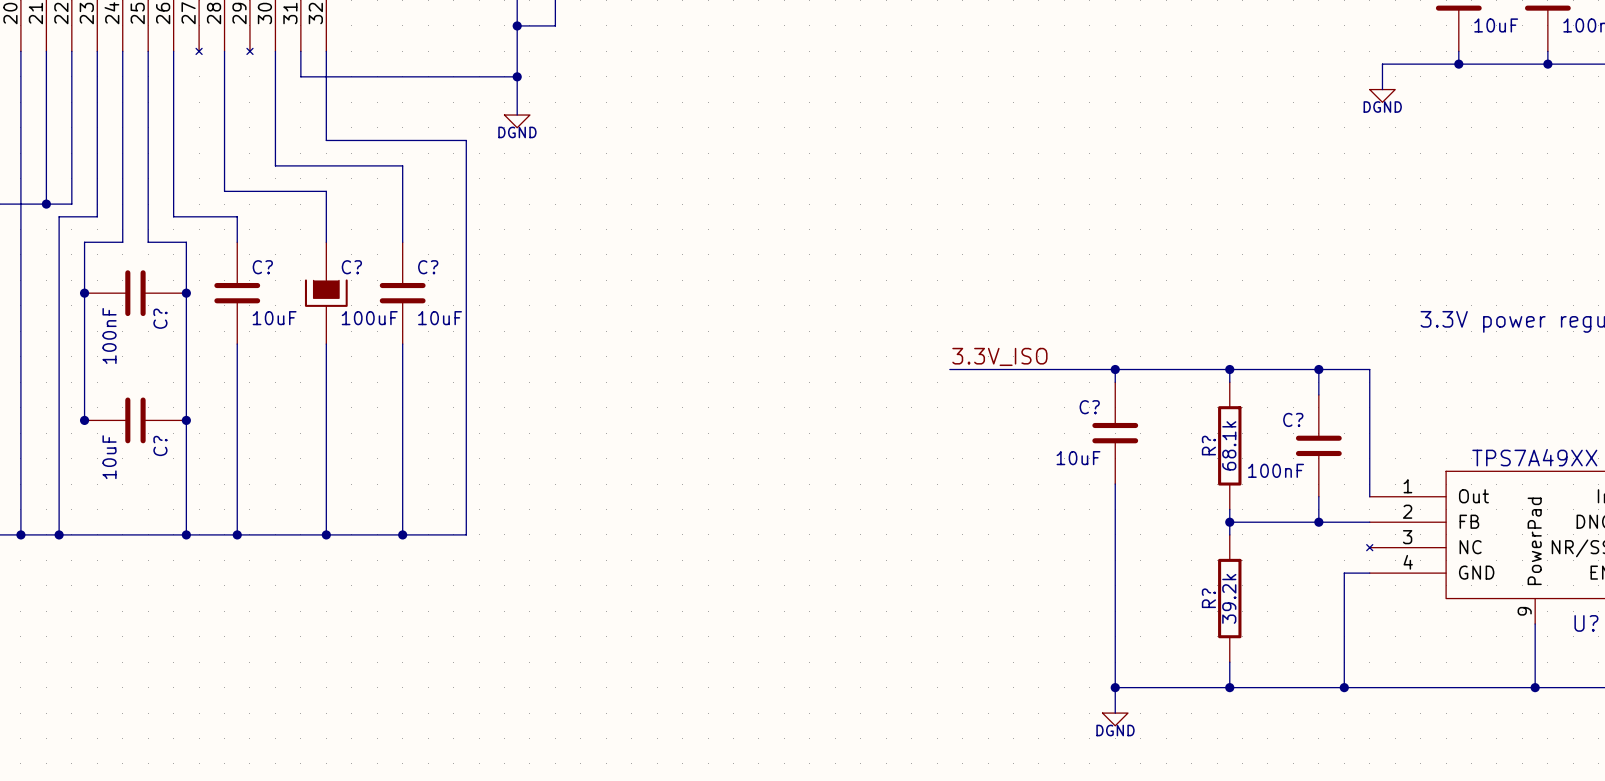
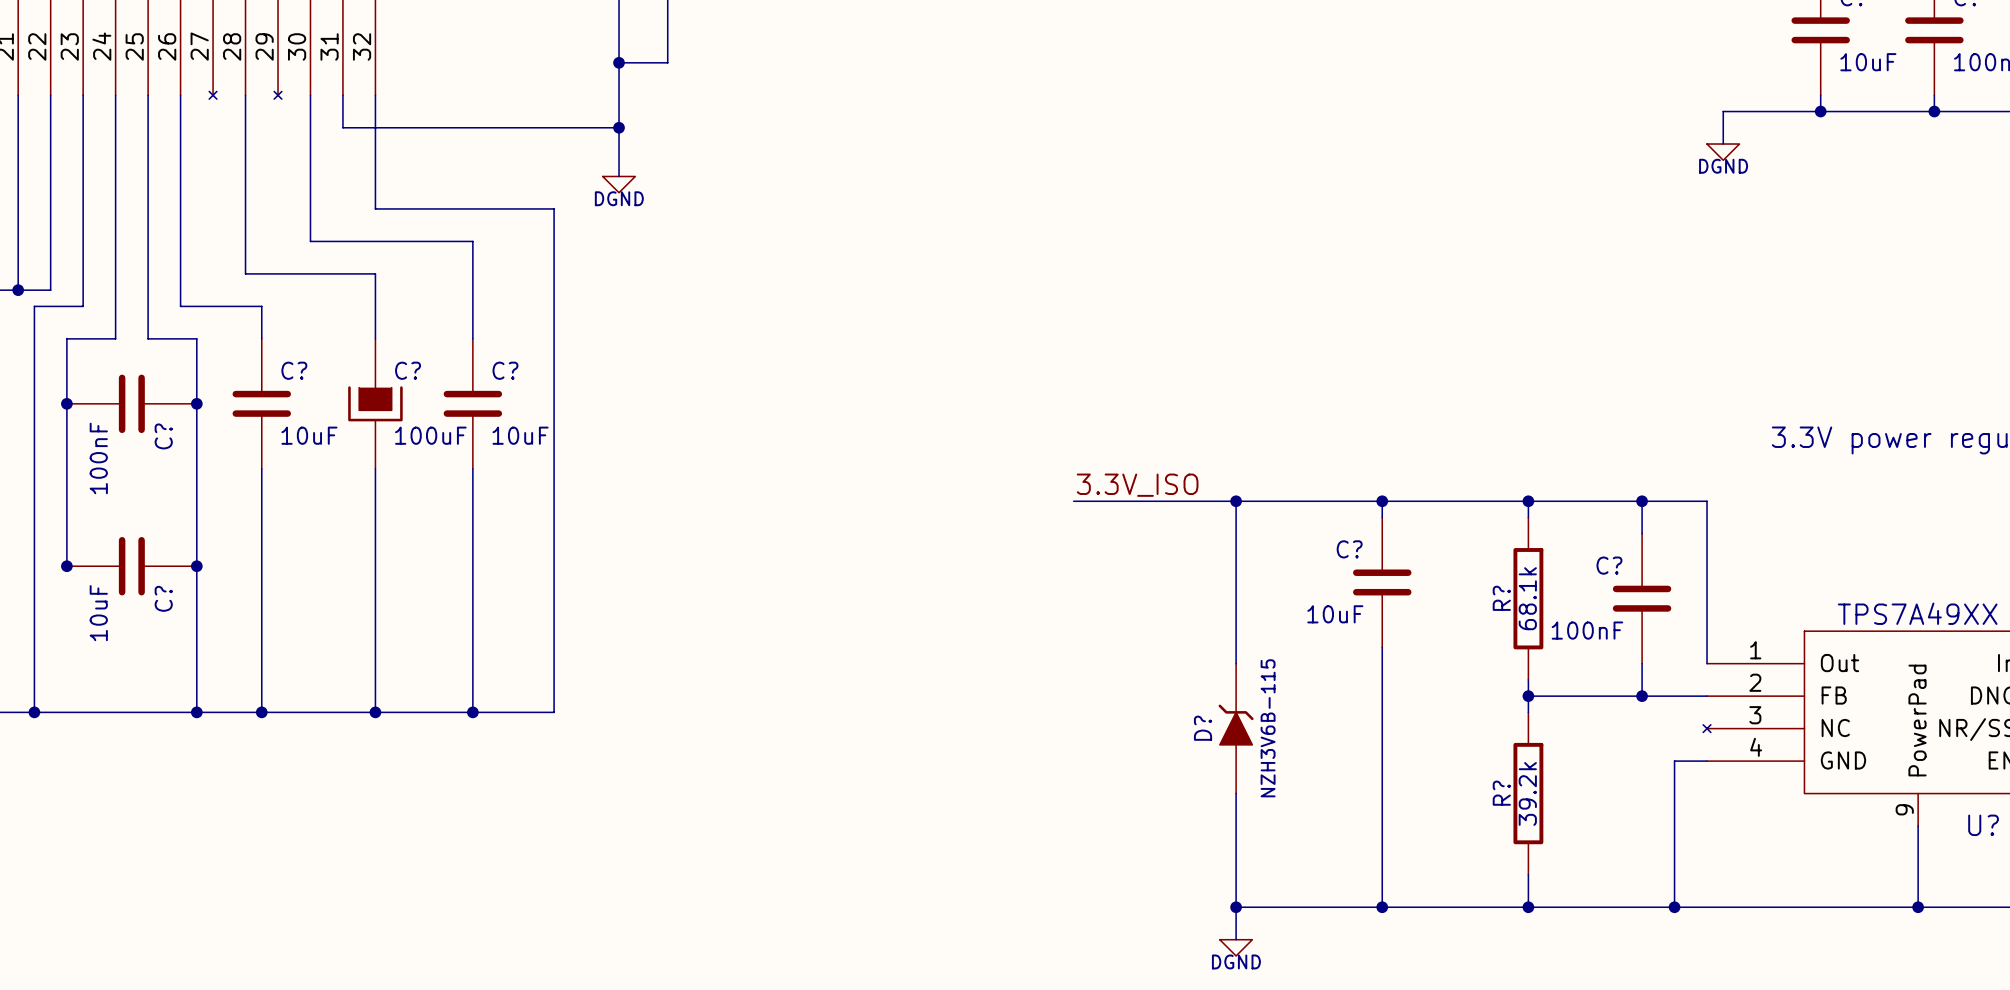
label position: 3.3V_ISO (999, 356) -> 3.3V_ISO (1137, 485)
wire: none -> (1073, 501) (1171, 501)
wire: none -> (1236, 501) (1236, 663)
junction: none -> (1236, 501)
D?: none -> NZH3V6B-115 (1236, 728)
wire: none -> (1236, 793) (1236, 939)
junction: none -> (1236, 907)
wire: (1115, 687) (1115, 713) -> (1382, 907) (1236, 907)
power symbol position: DGND (1115, 719) -> DGND (1236, 947)

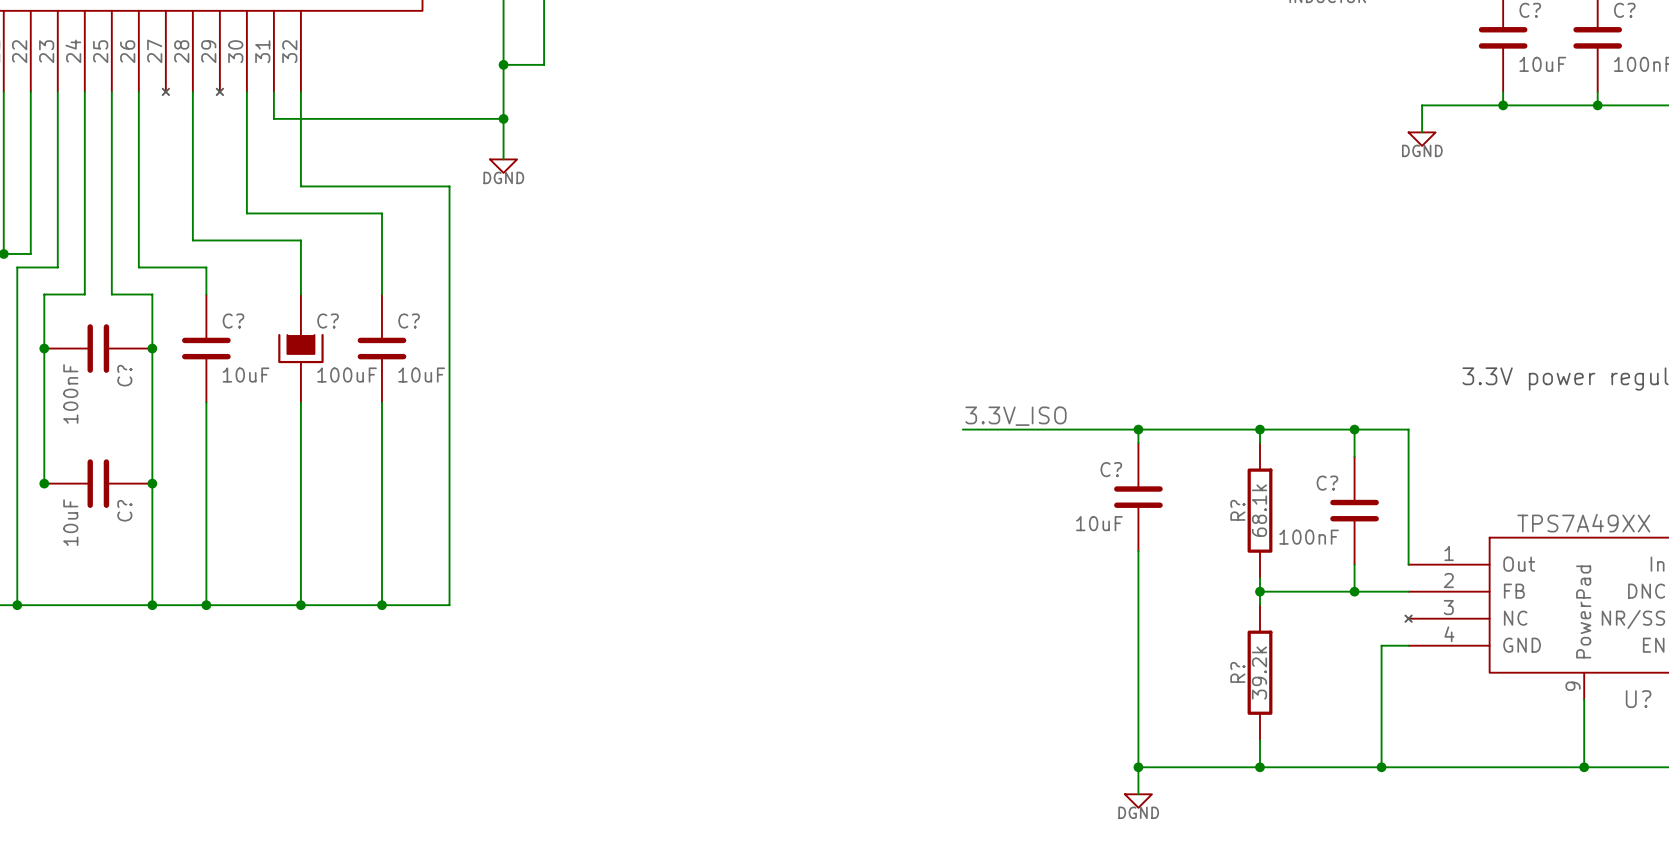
label position: 3.3V_ISO (1137, 485) -> 3.3V_ISO (1015, 416)
wire: (1073, 501) (1171, 501) -> none
wire: (1236, 501) (1236, 663) -> none
junction: (1236, 501) -> none
D?: NZH3V6B-115 (1236, 728) -> none
wire: (1236, 793) (1236, 939) -> none
wire: (1236, 907) (1382, 907) -> (1138, 794) (1138, 767)
junction: (1236, 907) -> none
power symbol position: DGND (1236, 947) -> DGND (1138, 801)

